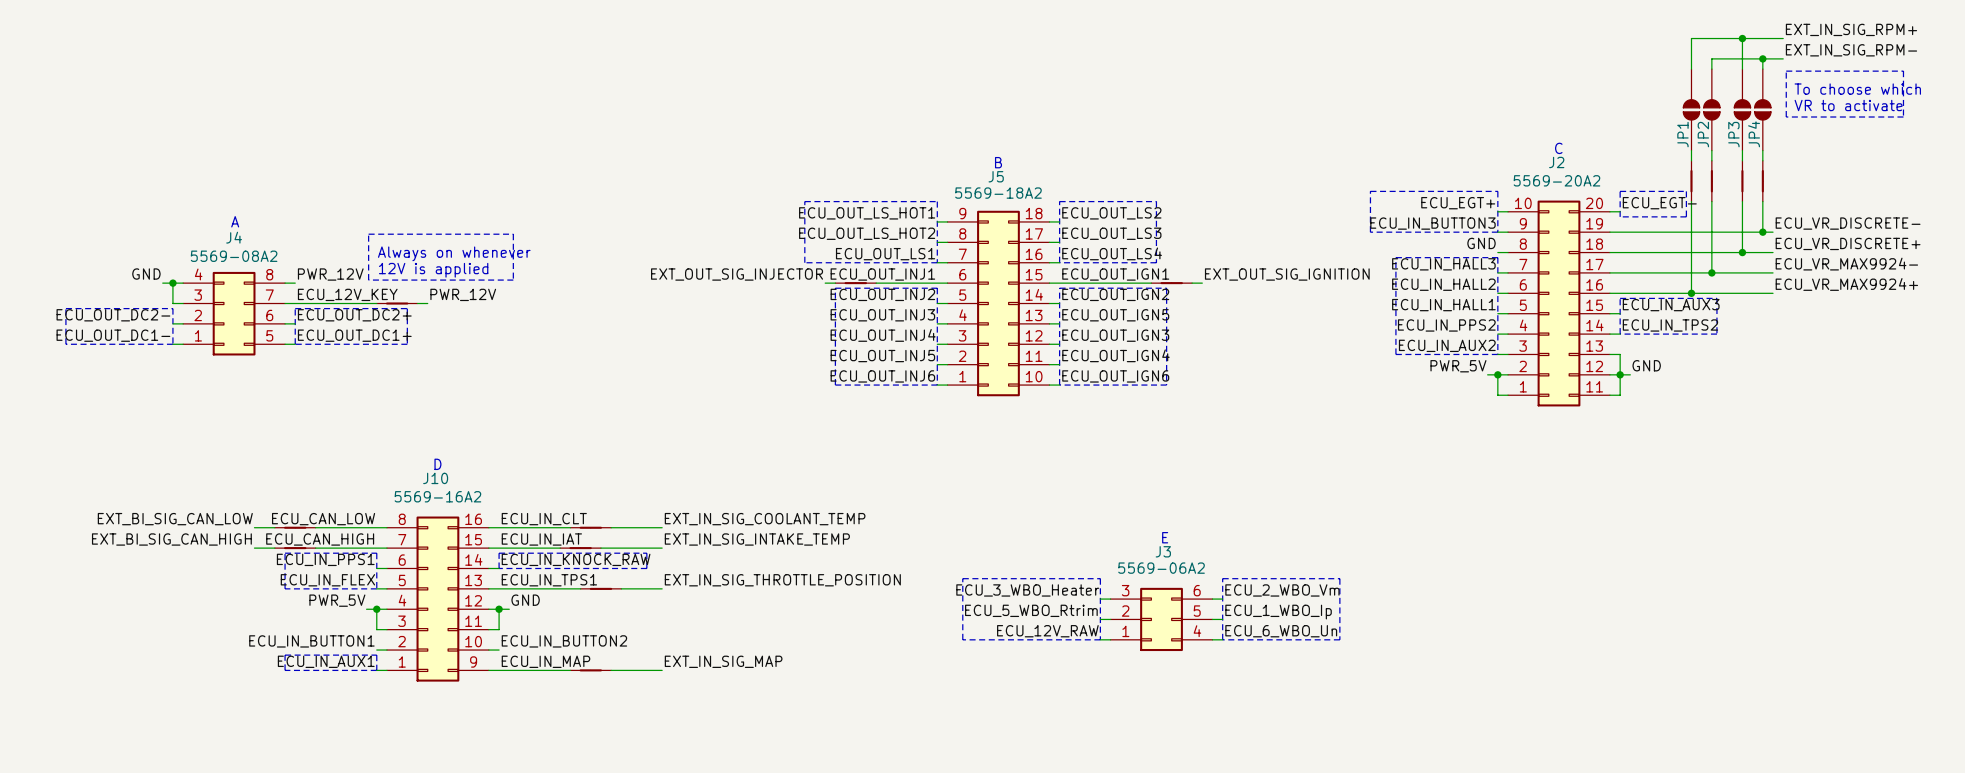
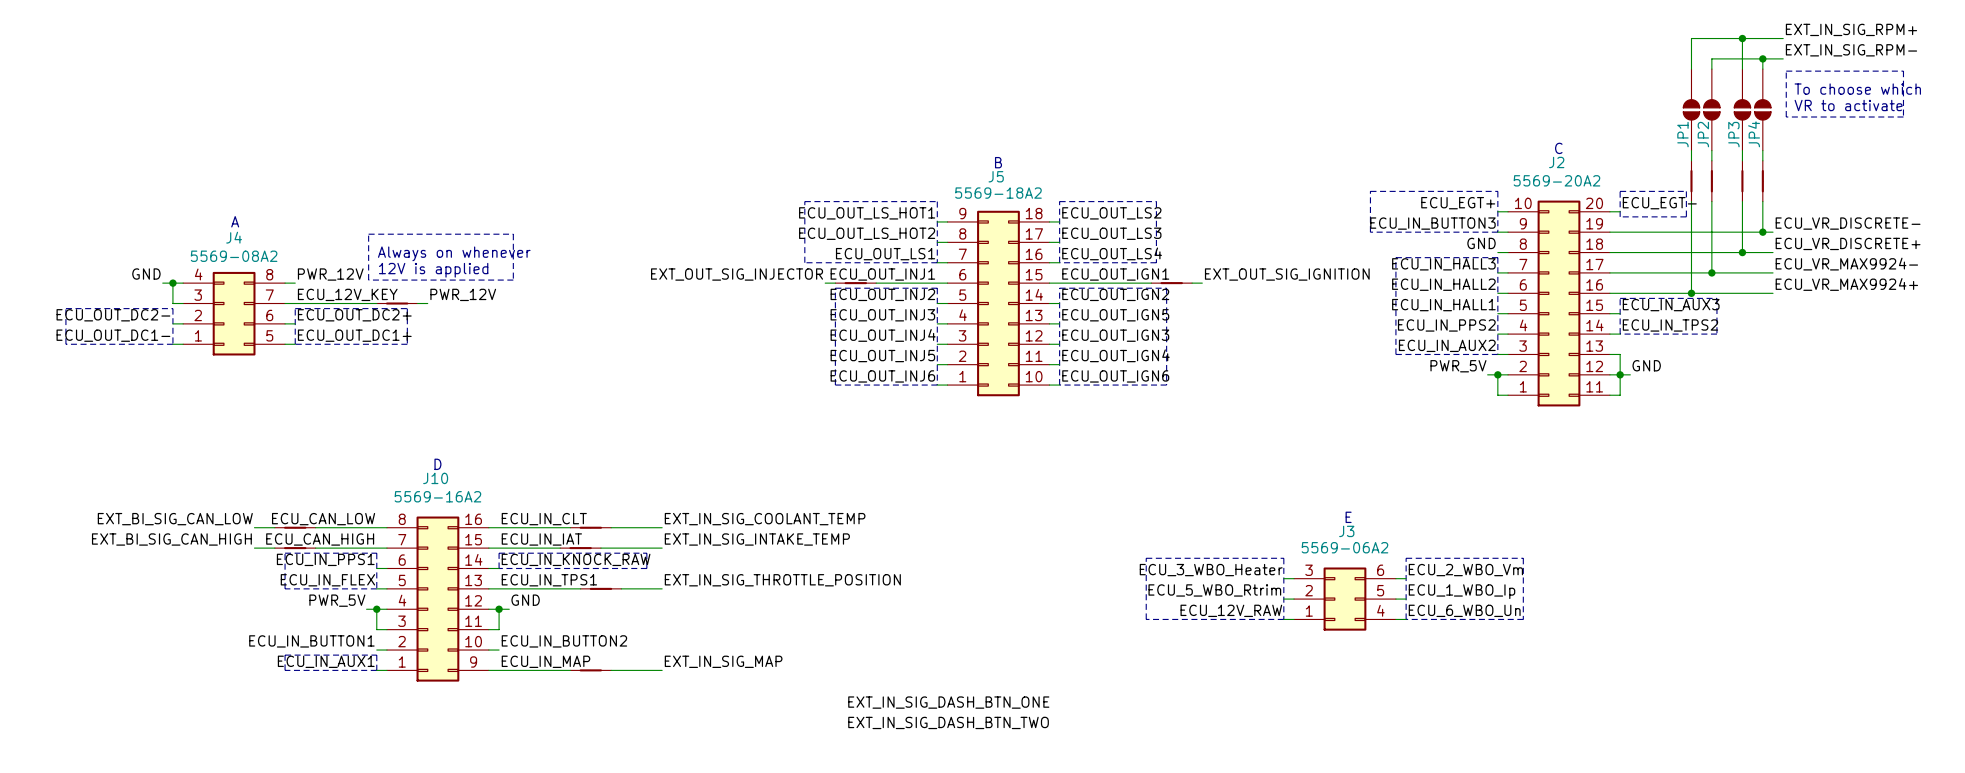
text position: E (1165, 537) -> E (1348, 517)
line: (962, 578) (1100, 578) (1100, 639) (962, 639) (962, 578) -> (1146, 558) (1283, 558) (1283, 619) (1146, 619) (1146, 558)
line: (1222, 578) (1339, 578) (1339, 639) (1222, 639) (1222, 578) -> (1406, 558) (1523, 558) (1523, 619) (1406, 619) (1406, 558)
label position: ECU_3_WBO_Heater (1027, 590) -> ECU_3_WBO_Heater (1211, 570)
label position: ECU_2_WBO_Vm (1282, 590) -> ECU_2_WBO_Vm (1465, 570)
wire: (1100, 599) (1110, 599) -> (1283, 578) (1294, 578)
wire: (1212, 599) (1222, 599) -> (1395, 578) (1406, 578)
label position: ECU_5_WBO_Rtrim (1031, 610) -> ECU_5_WBO_Rtrim (1214, 590)
label position: ECU_1_WBO_Ip (1278, 612) -> ECU_1_WBO_Ip (1462, 591)
wire: (1100, 619) (1110, 619) -> (1283, 599) (1294, 599)
J3 position: (1161, 619) -> (1344, 599)
wire: (1212, 619) (1222, 619) -> (1395, 599) (1406, 599)
label position: ECU_12V_RAW (1047, 631) -> ECU_12V_RAW (1231, 610)
label position: ECU_6_WBO_Un (1281, 631) -> ECU_6_WBO_Un (1464, 610)
wire: (1100, 639) (1110, 639) -> (1283, 619) (1294, 619)
wire: (1212, 639) (1222, 639) -> (1395, 619) (1406, 619)
label: none -> EXT_IN_SIG_DASH_BTN_ONE (948, 702)
label: none -> EXT_IN_SIG_DASH_BTN_TWO (948, 722)

